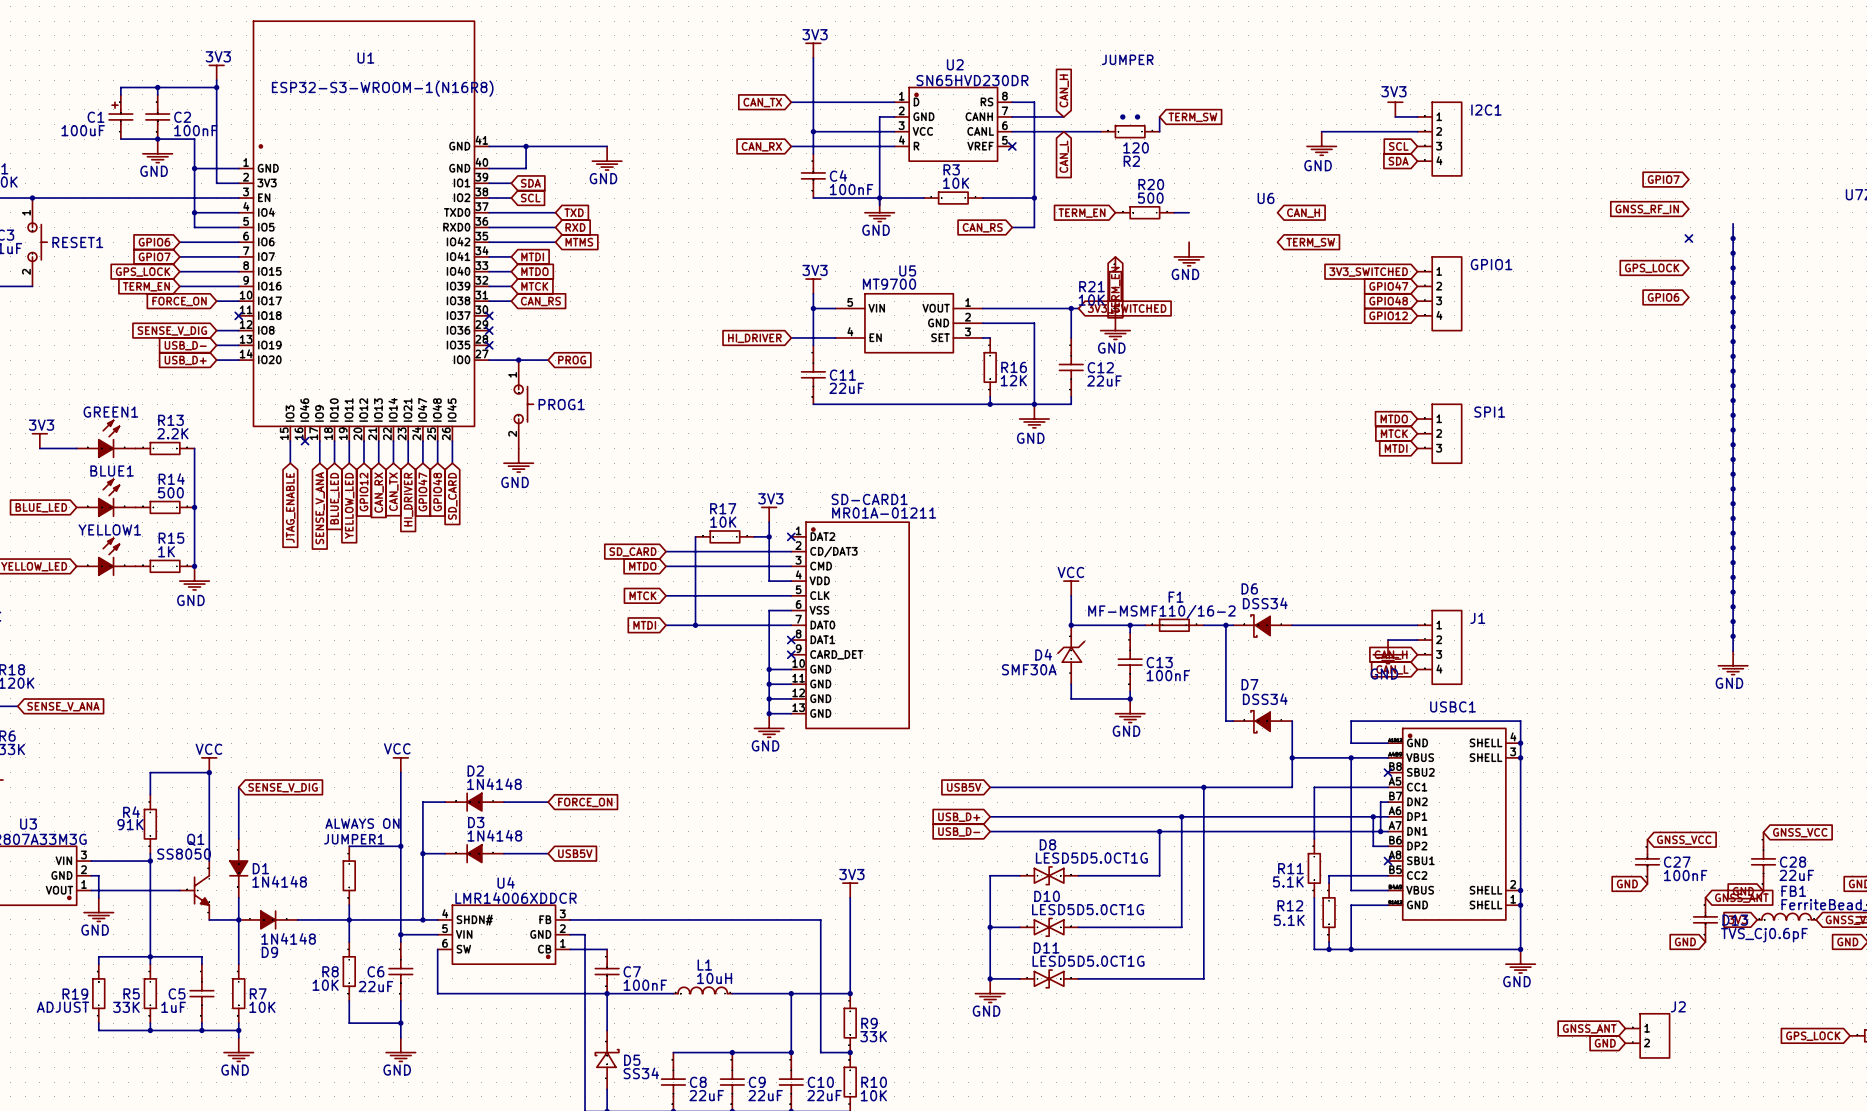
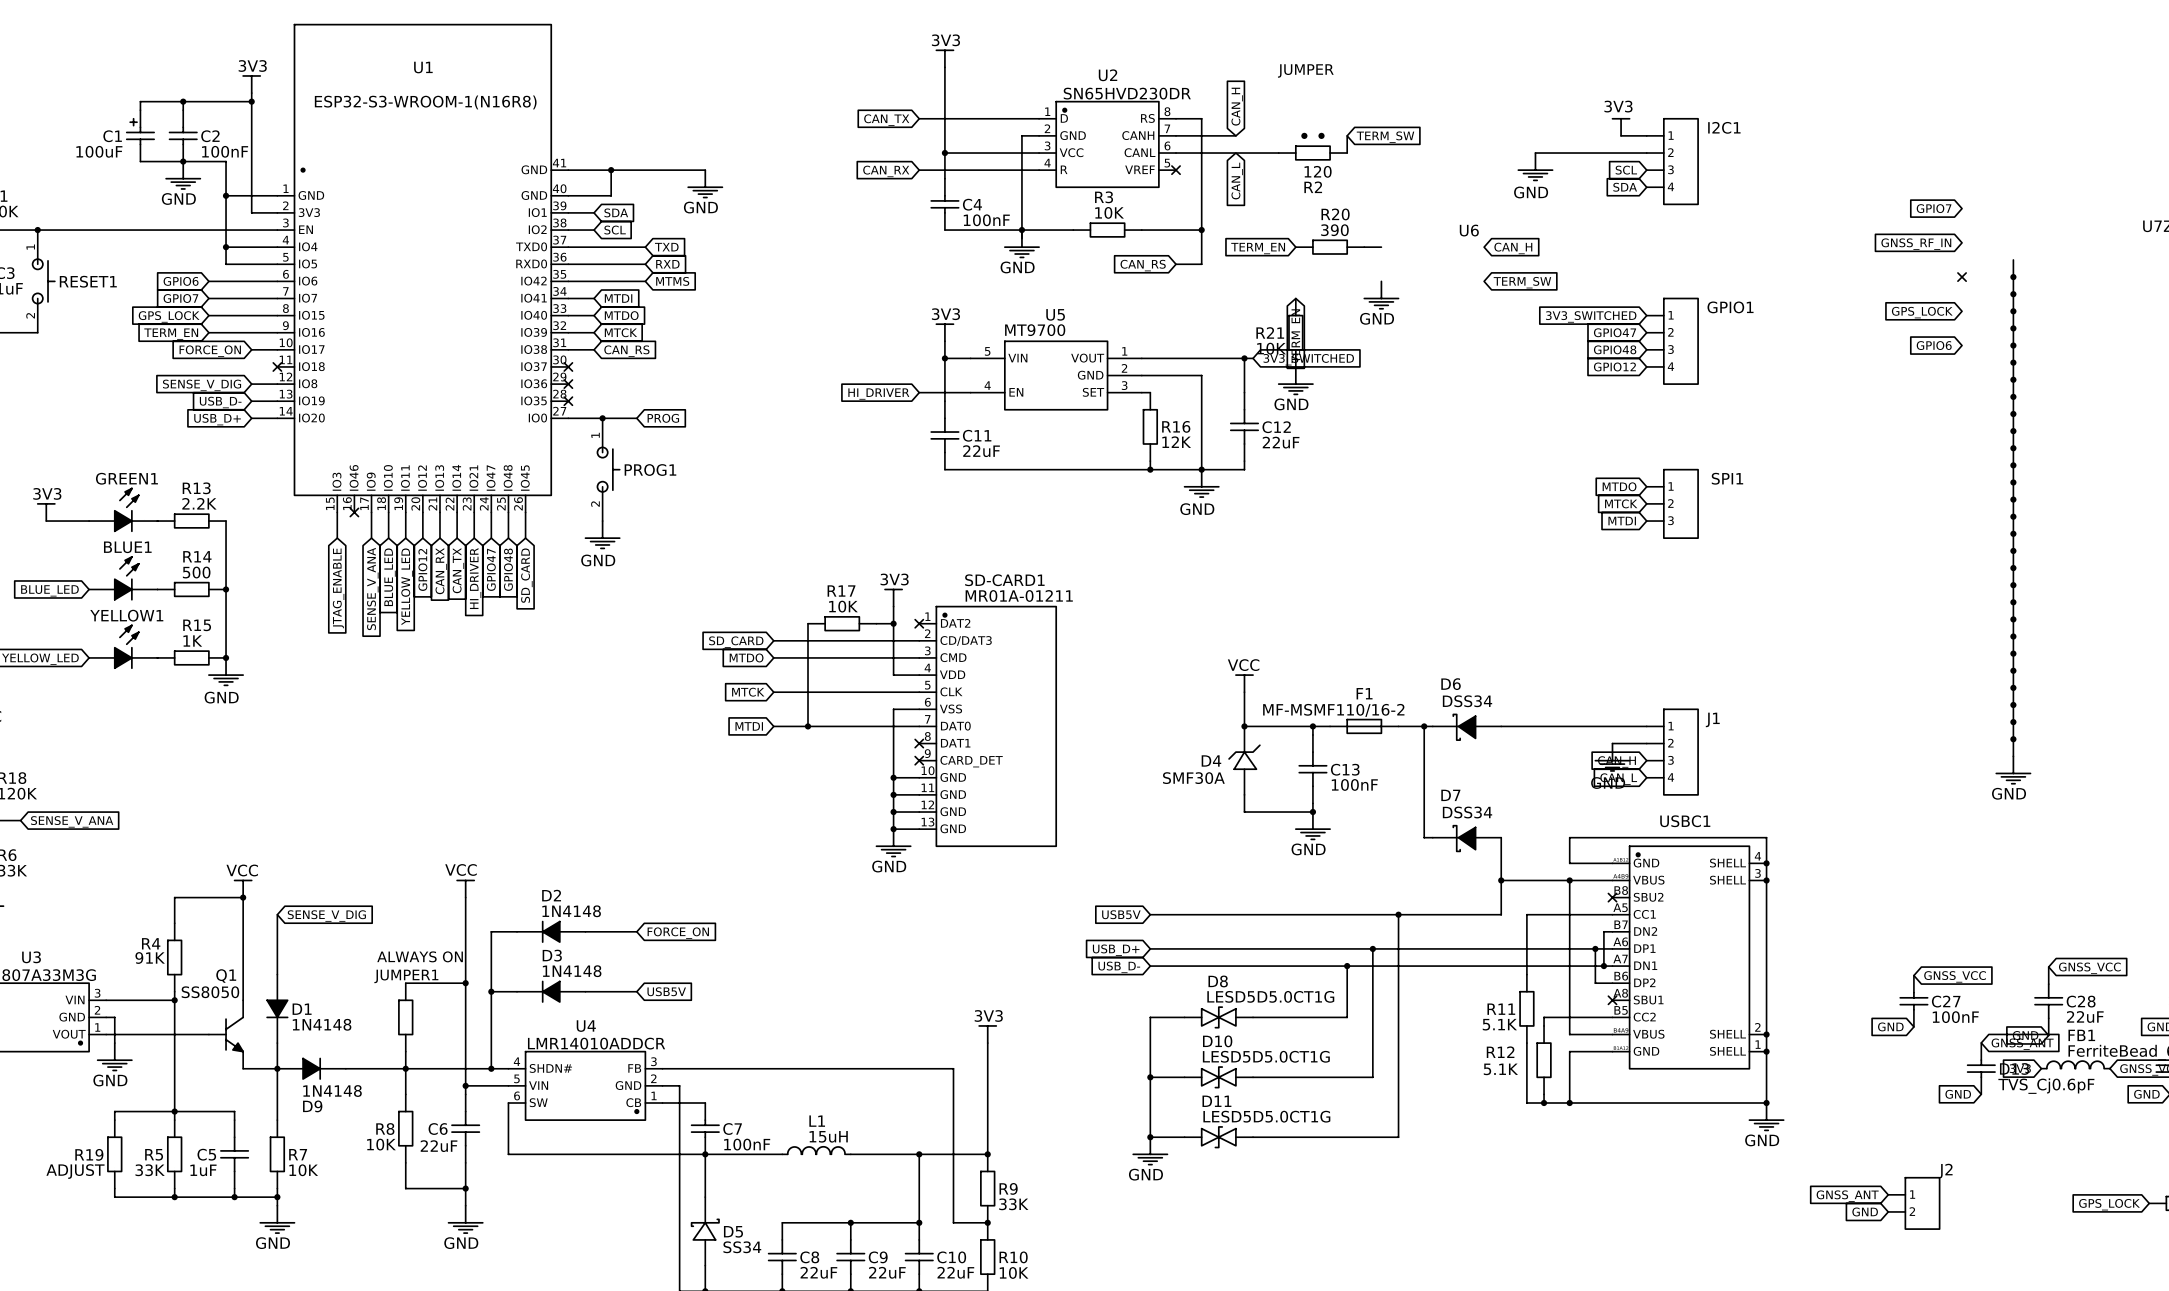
R20 value: 500 (1150, 198) -> 390 (1334, 230)
U4 value: LMR14006XDDCR (516, 898) -> LMR14010ADDCR (596, 1043)
L1 value: 10uH (714, 978) -> 15uH (828, 1136)

